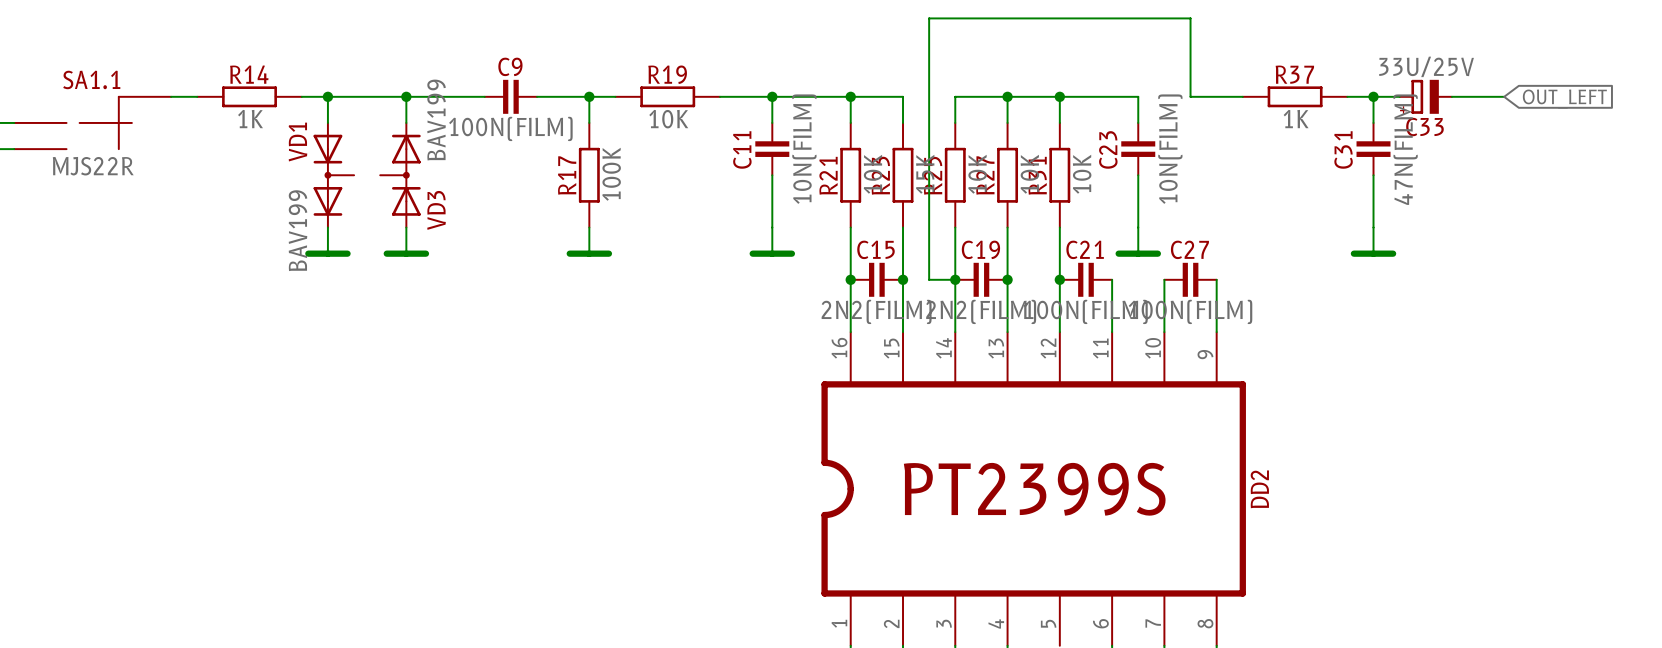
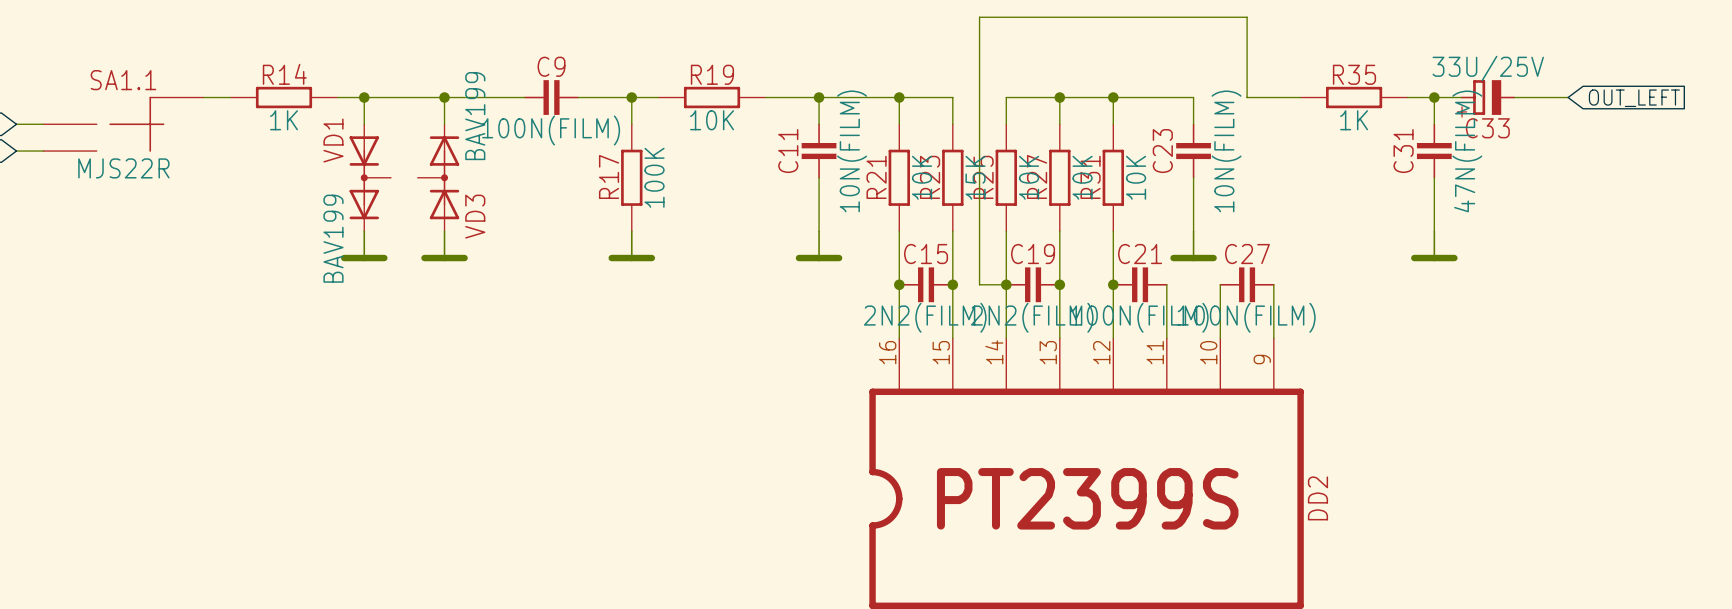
R37 name: R37 (1294, 74) -> R35 (1354, 74)

